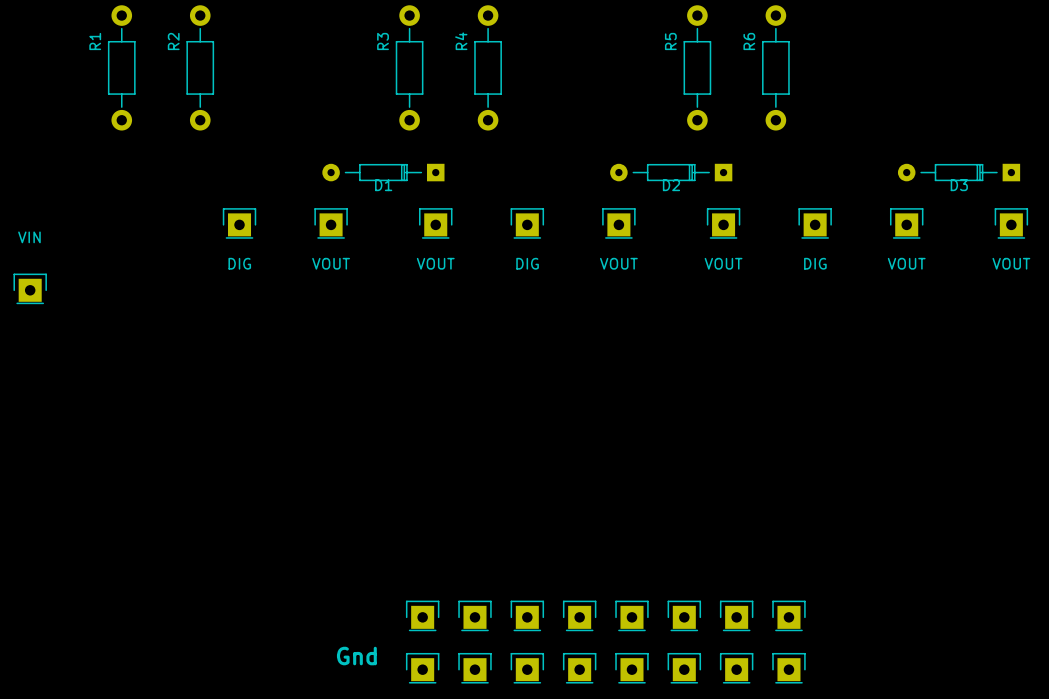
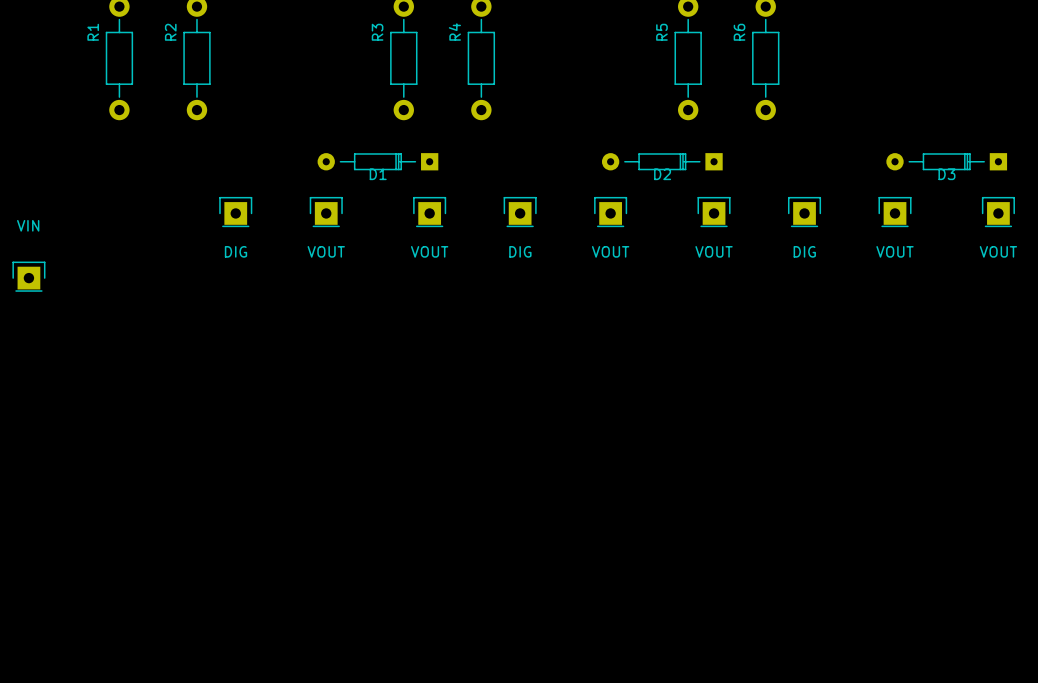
part: (422, 615) -> none
part: (474, 615) -> none
part: (527, 615) -> none
part: (579, 615) -> none
part: (631, 615) -> none
part: (684, 615) -> none
part: (736, 615) -> none
part: (788, 615) -> none
text: Gnd (356, 656) -> none
part: (422, 668) -> none
part: (474, 668) -> none
part: (527, 668) -> none
part: (579, 668) -> none
part: (631, 668) -> none
part: (684, 668) -> none
part: (736, 668) -> none
part: (788, 668) -> none

